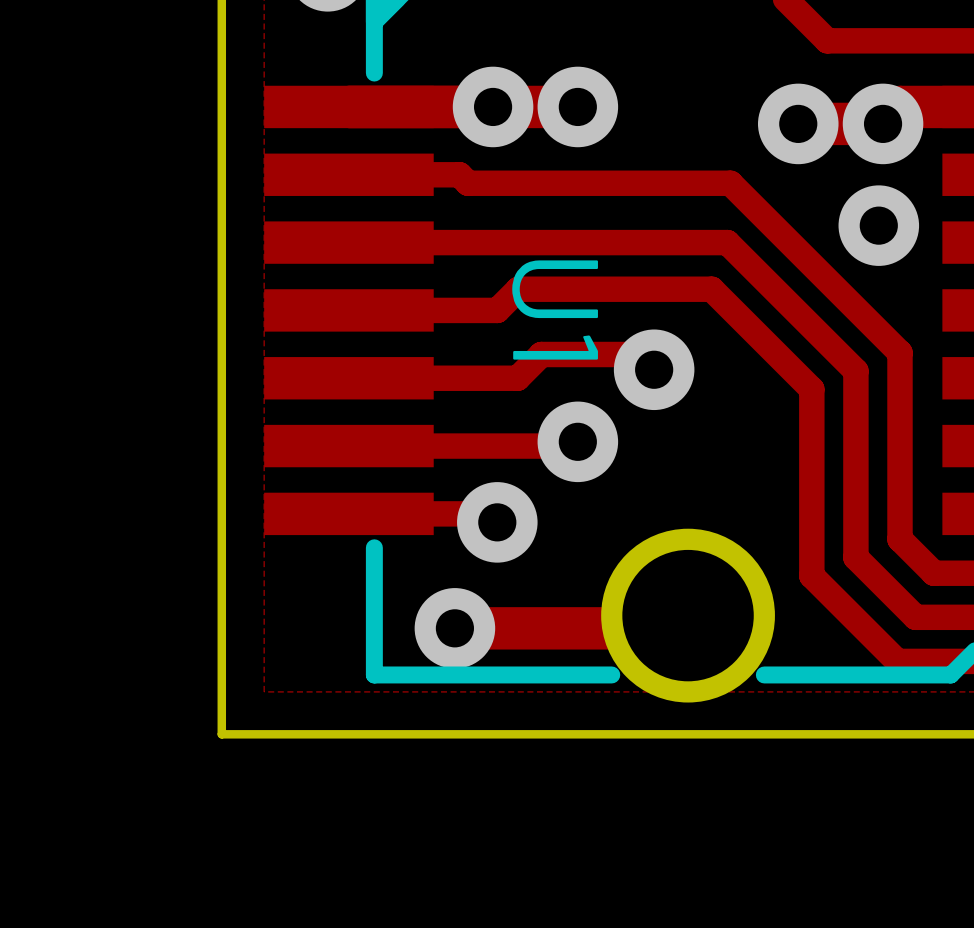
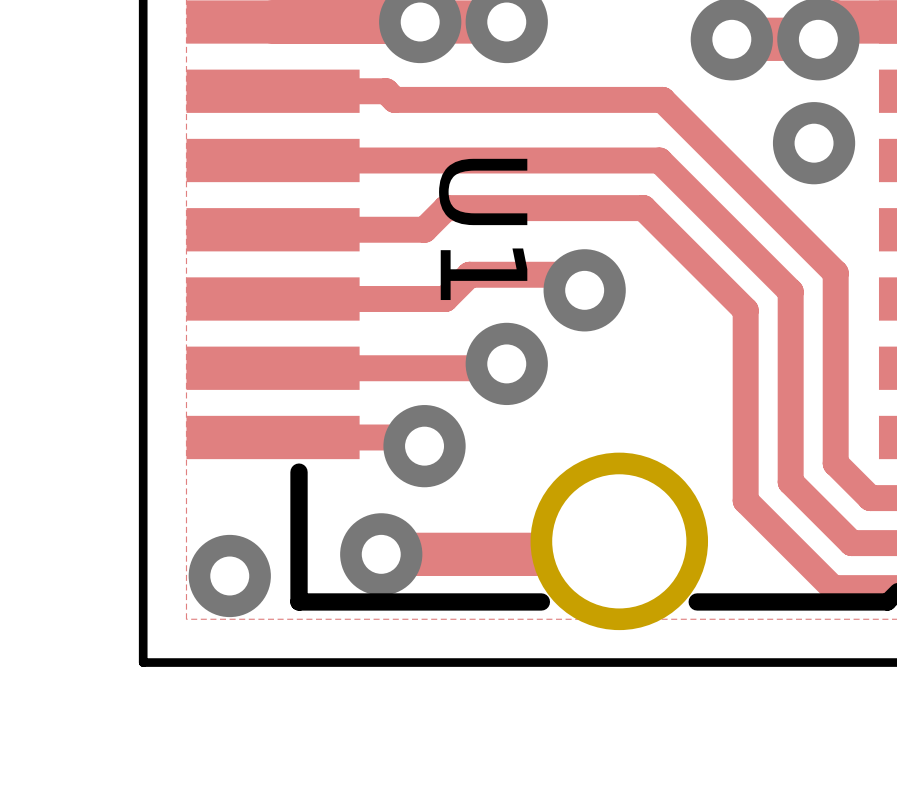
via: none -> (229, 575)

